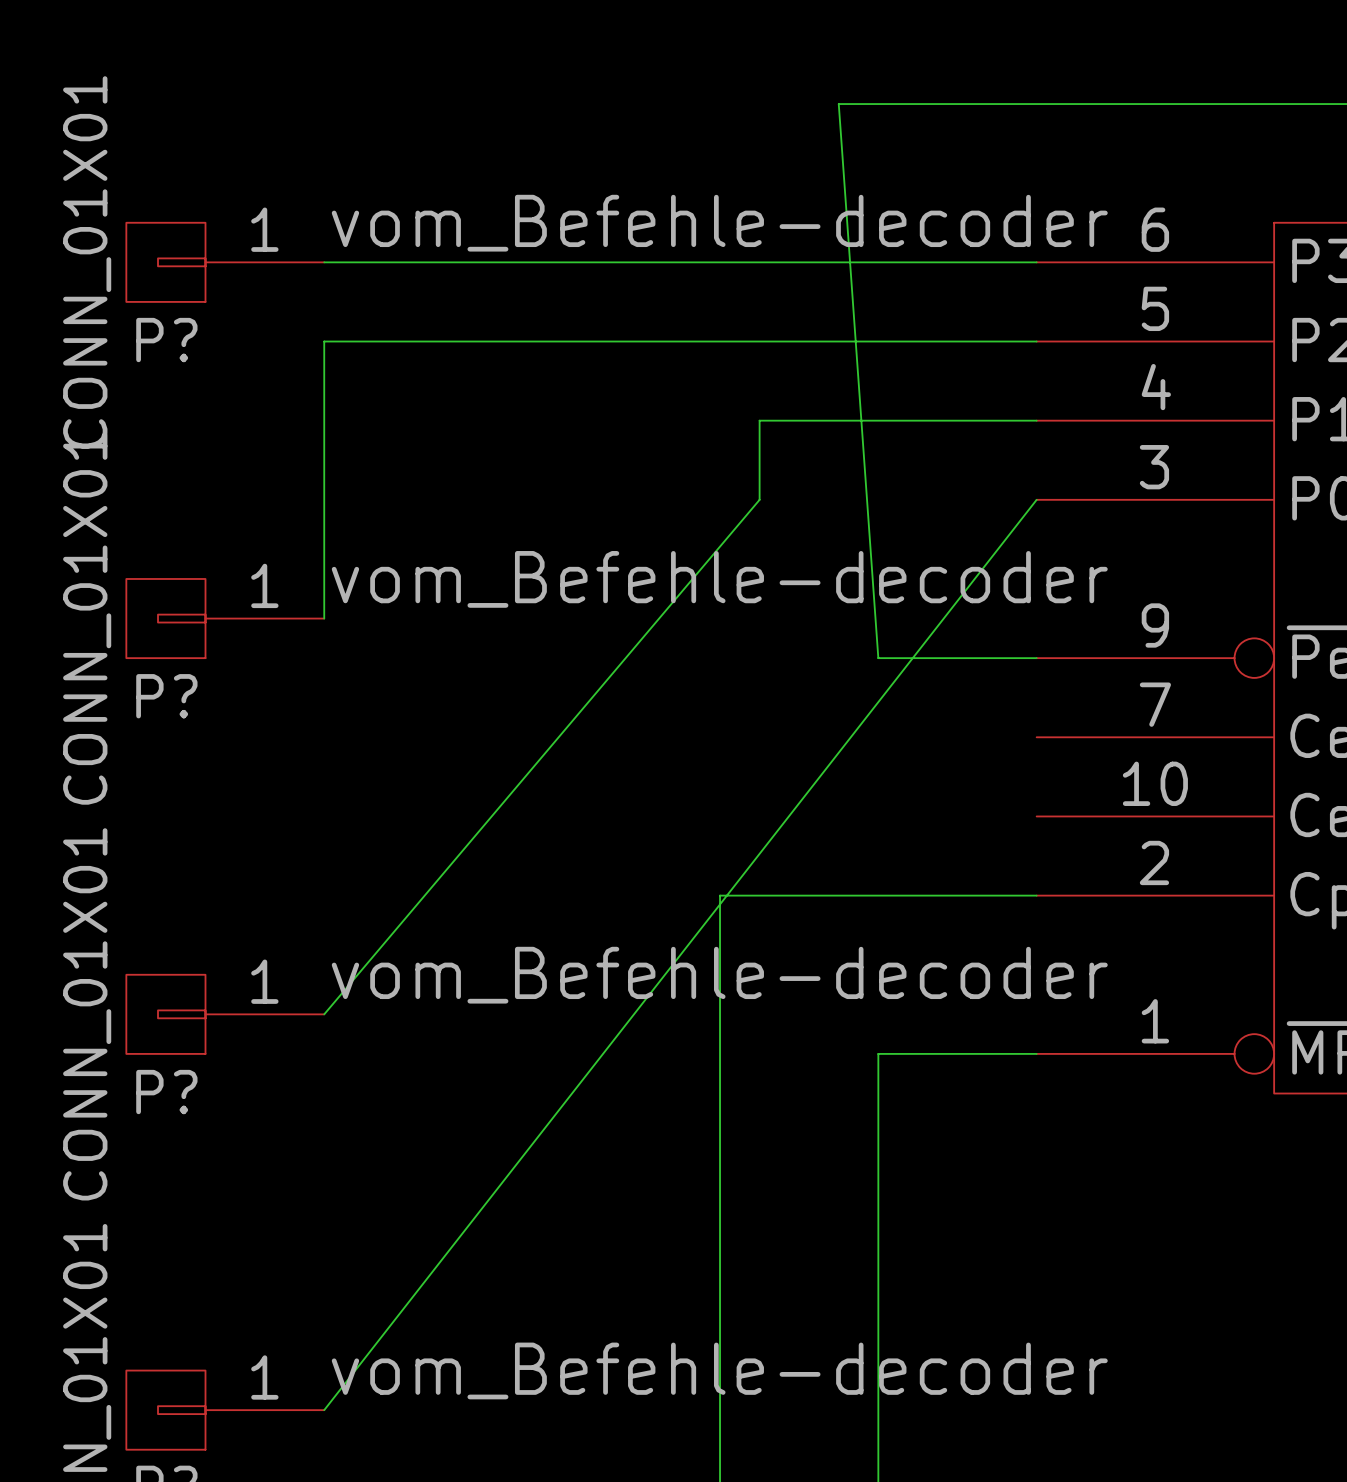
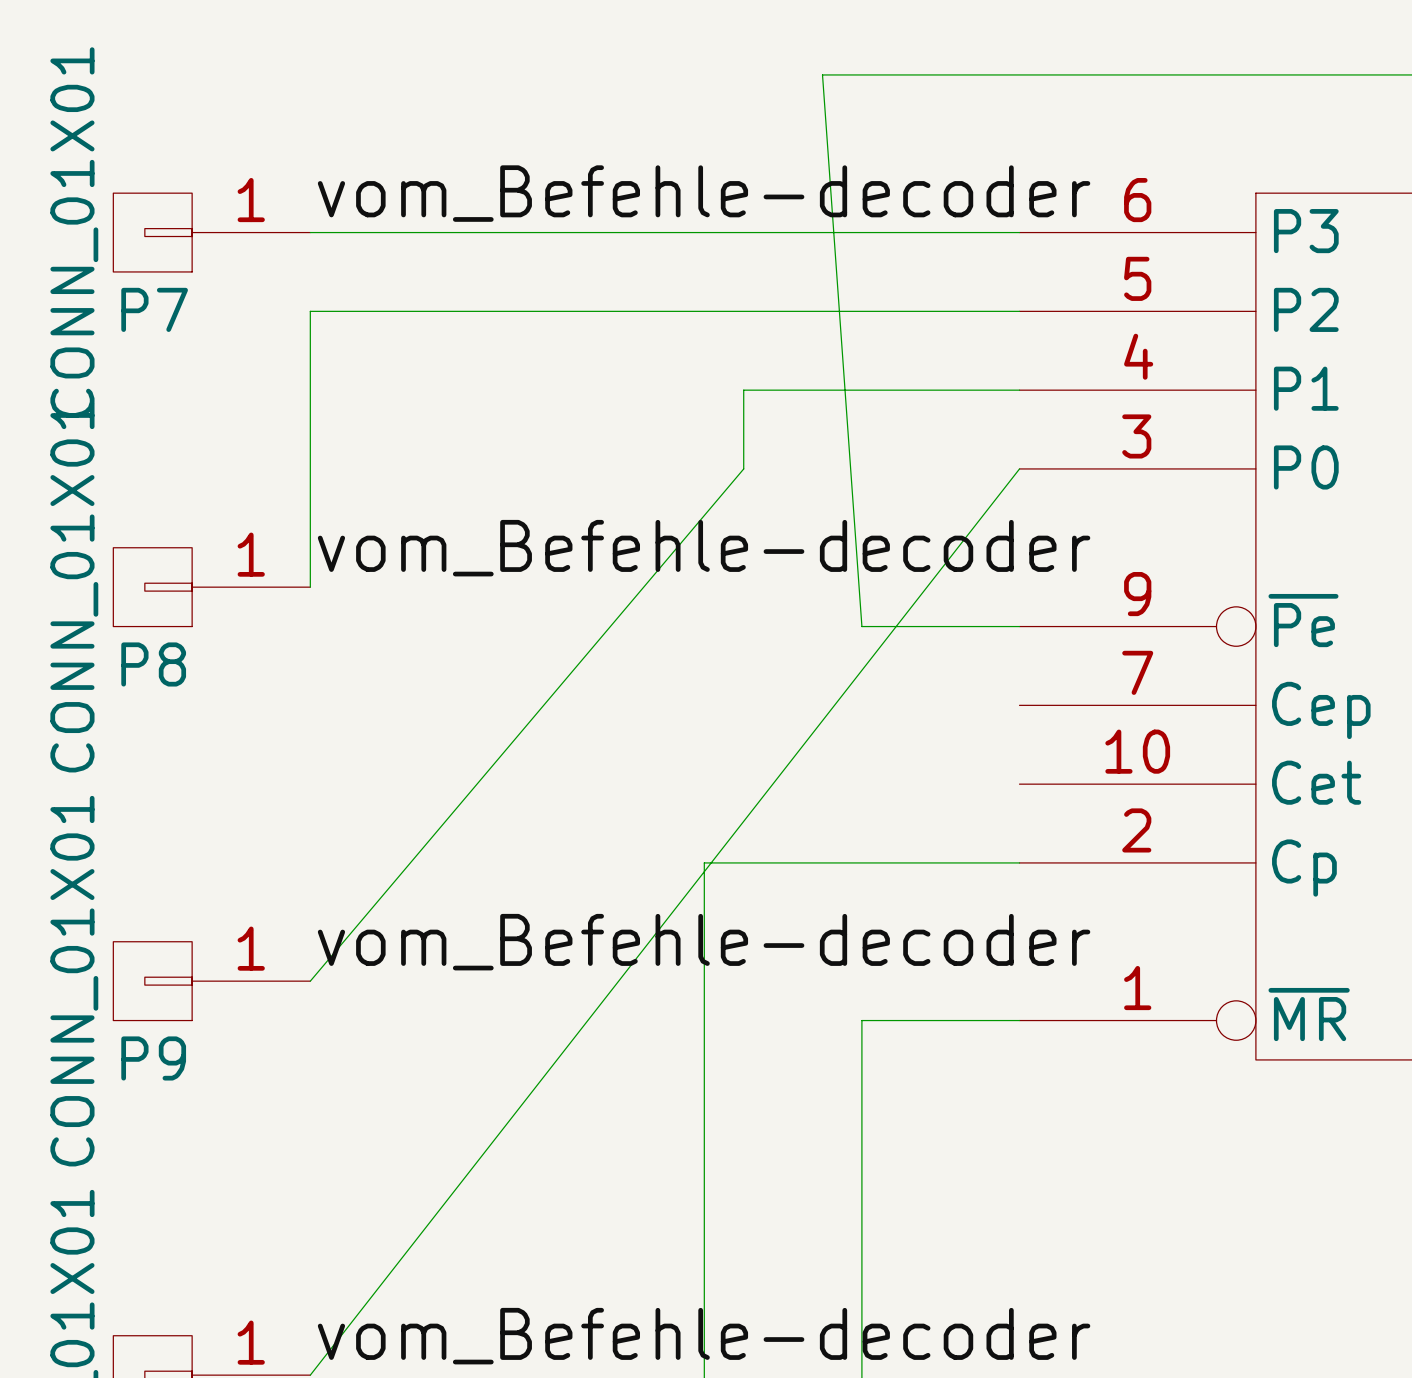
P? name: P? (166, 340) -> P7 (154, 309)
P? name: P? (166, 696) -> P8 (153, 664)
P? name: P? (166, 1092) -> P9 (153, 1058)

